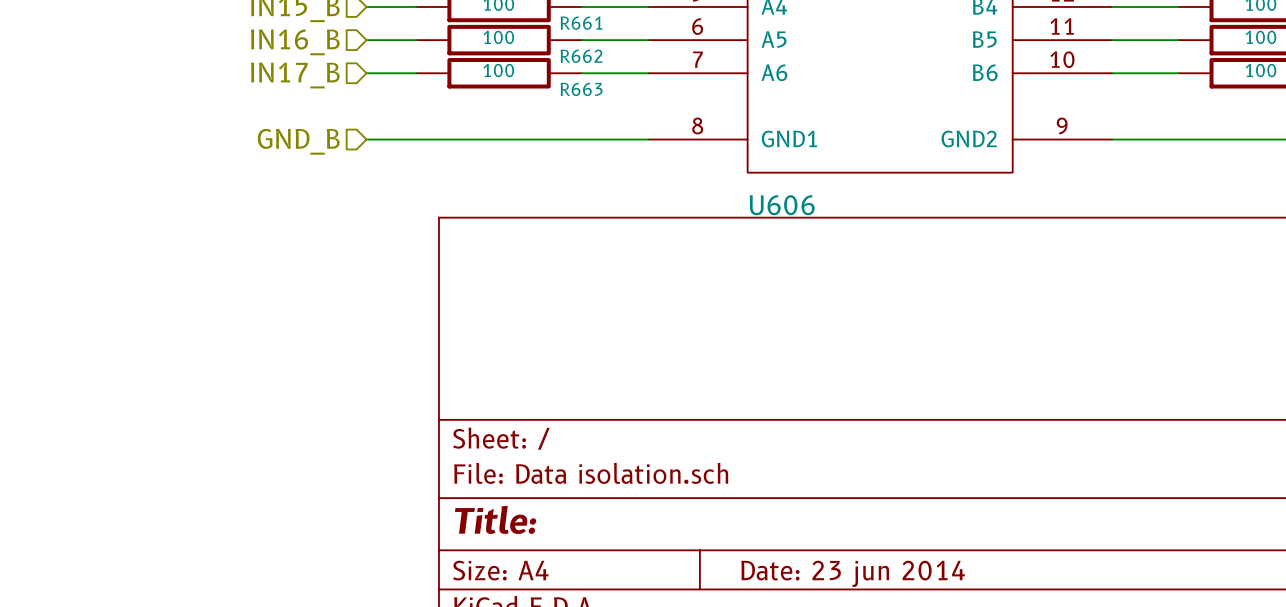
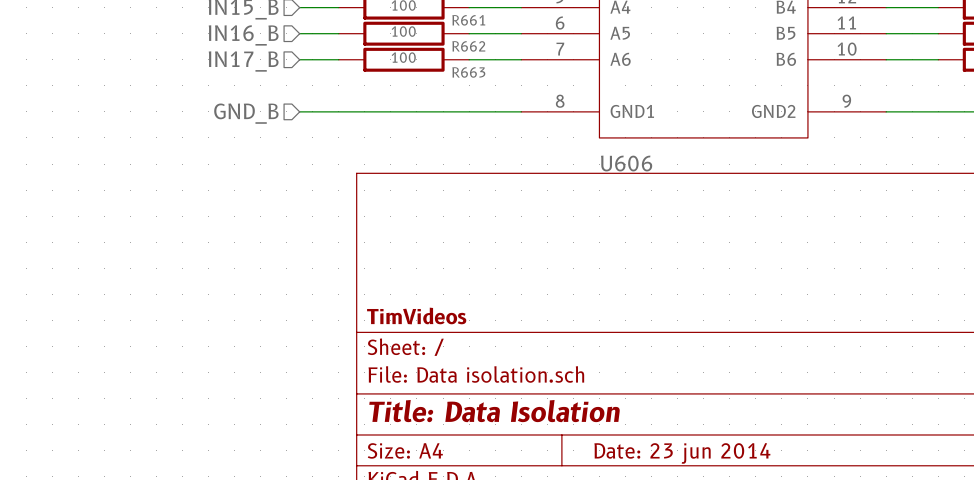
title block: none -> TimVideos (416, 316)
title block: Title: (495, 519) -> Title: Data Isolation (494, 411)

